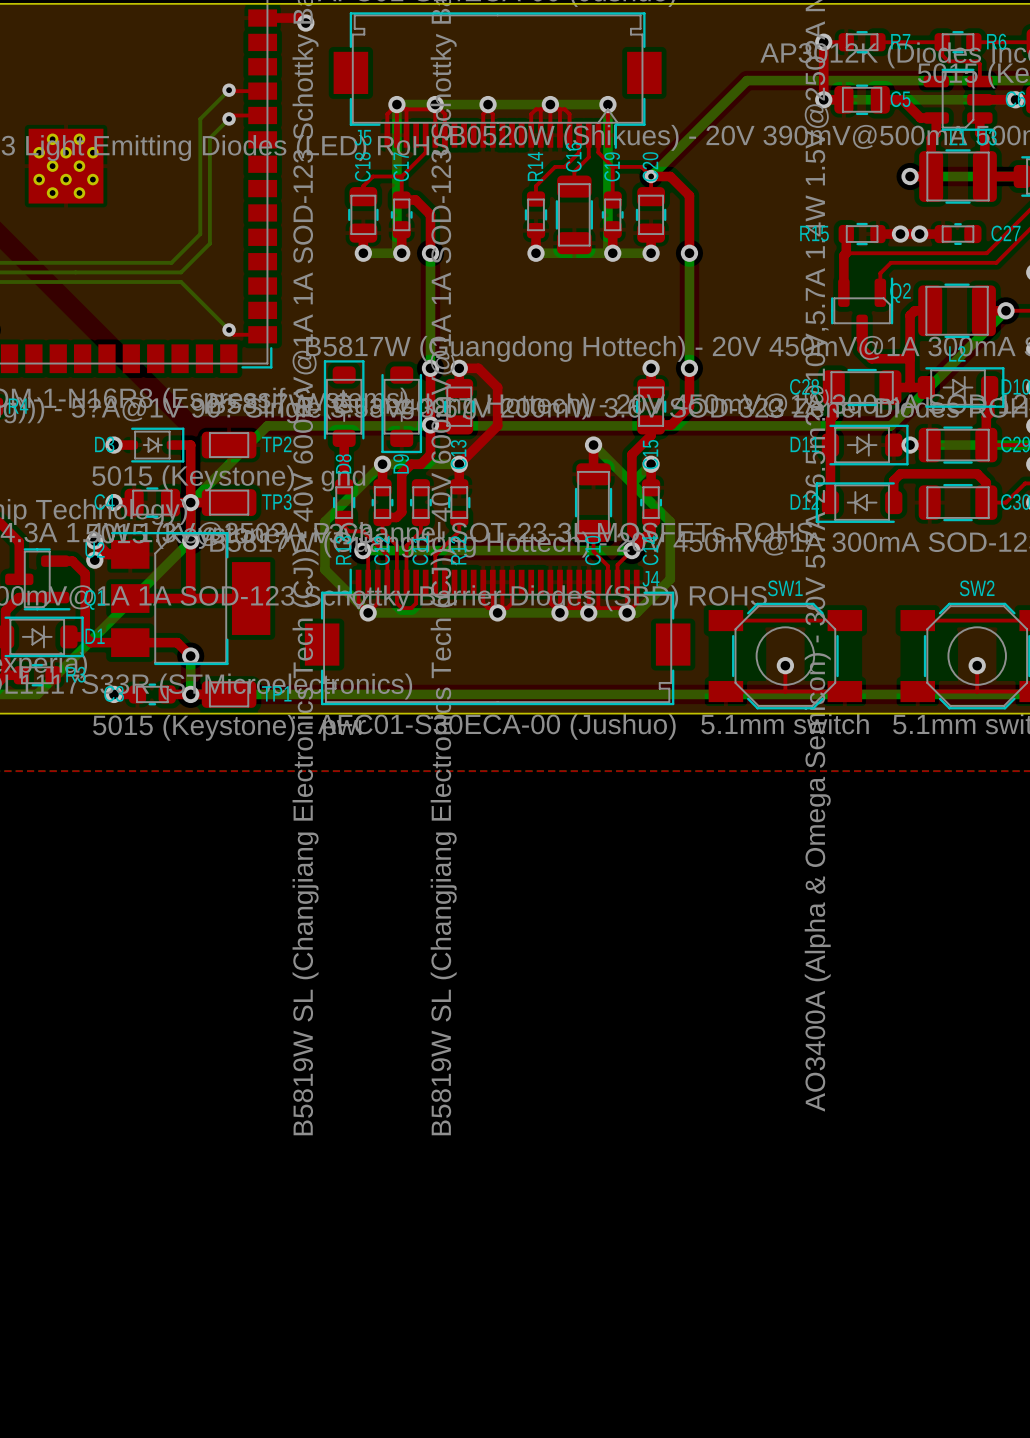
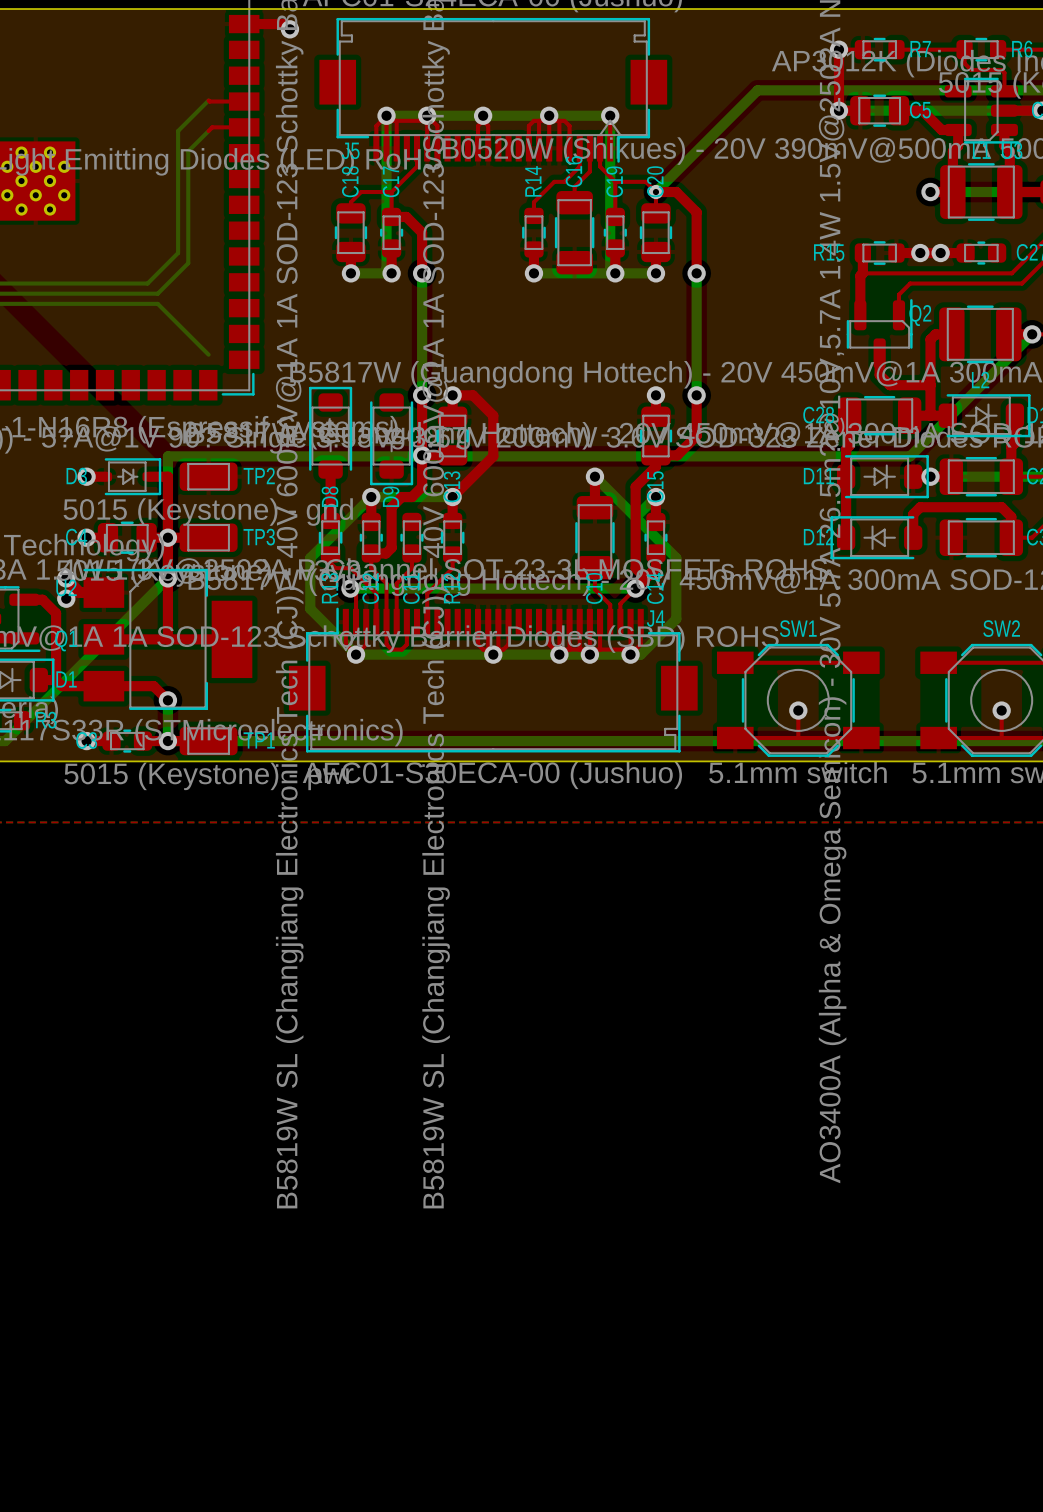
via: (229, 90) -> none
via: (229, 118) -> none
top track: (229, 329) (233, 334) (262, 334) -> none
via: (229, 329) -> none
bottom track: (267, 425) (190, 502) -> (249, 456) (167, 456) (167, 537)

